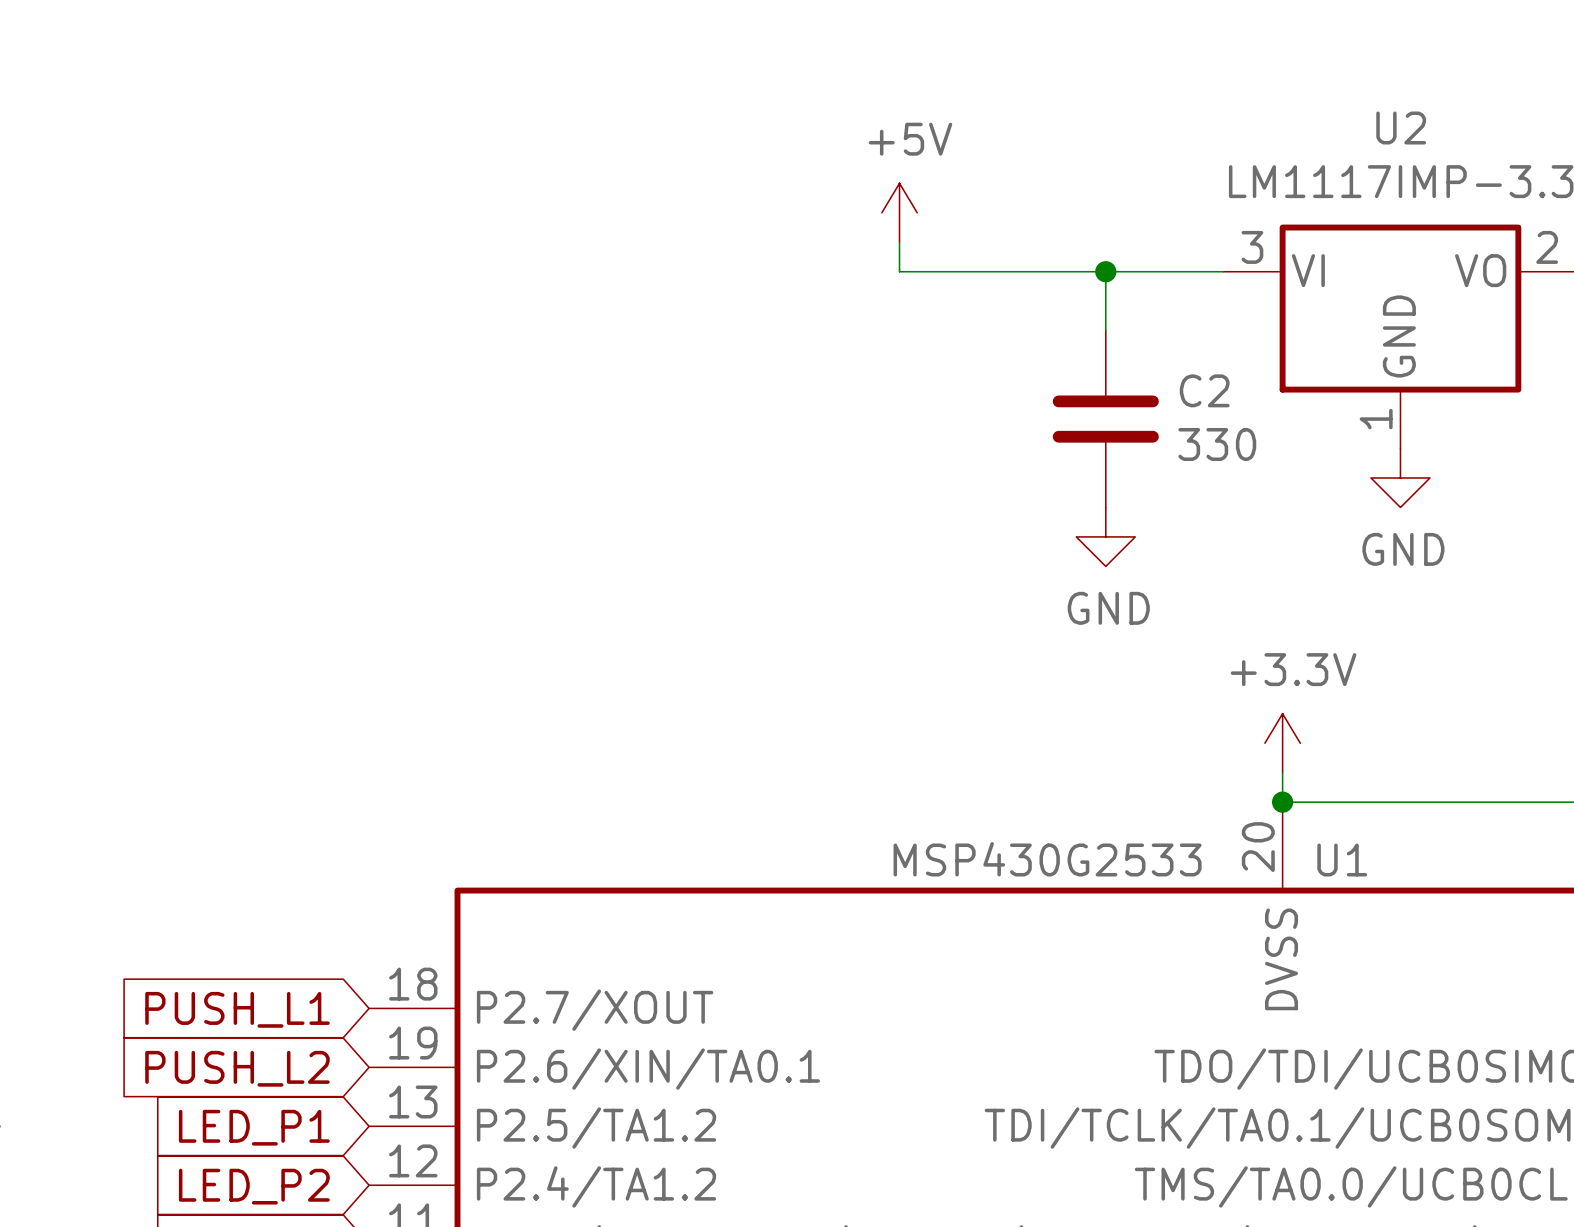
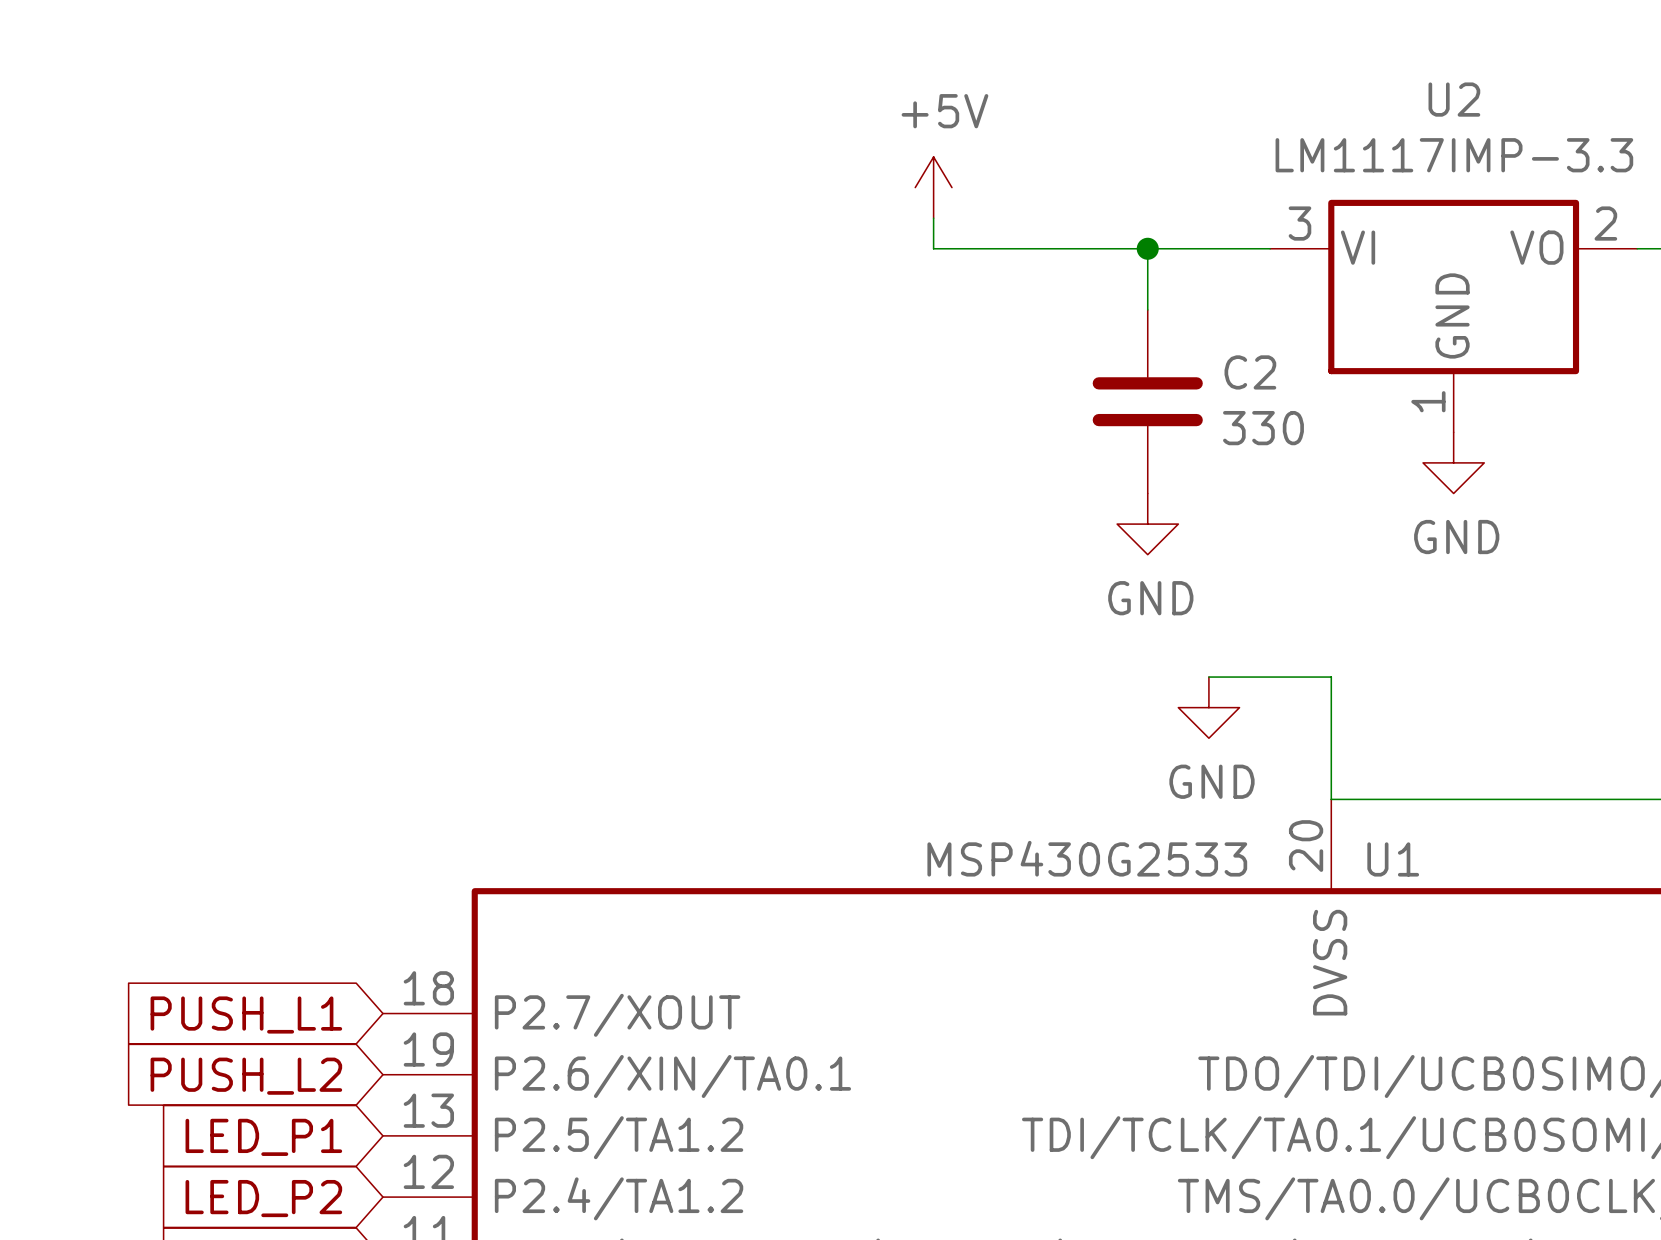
wire: none -> (1208, 677) (1331, 677) (1331, 768)
power symbol: none -> GND (1208, 707)
power symbol: +3.3V (1282, 743) -> none
junction: (1282, 802) -> none

